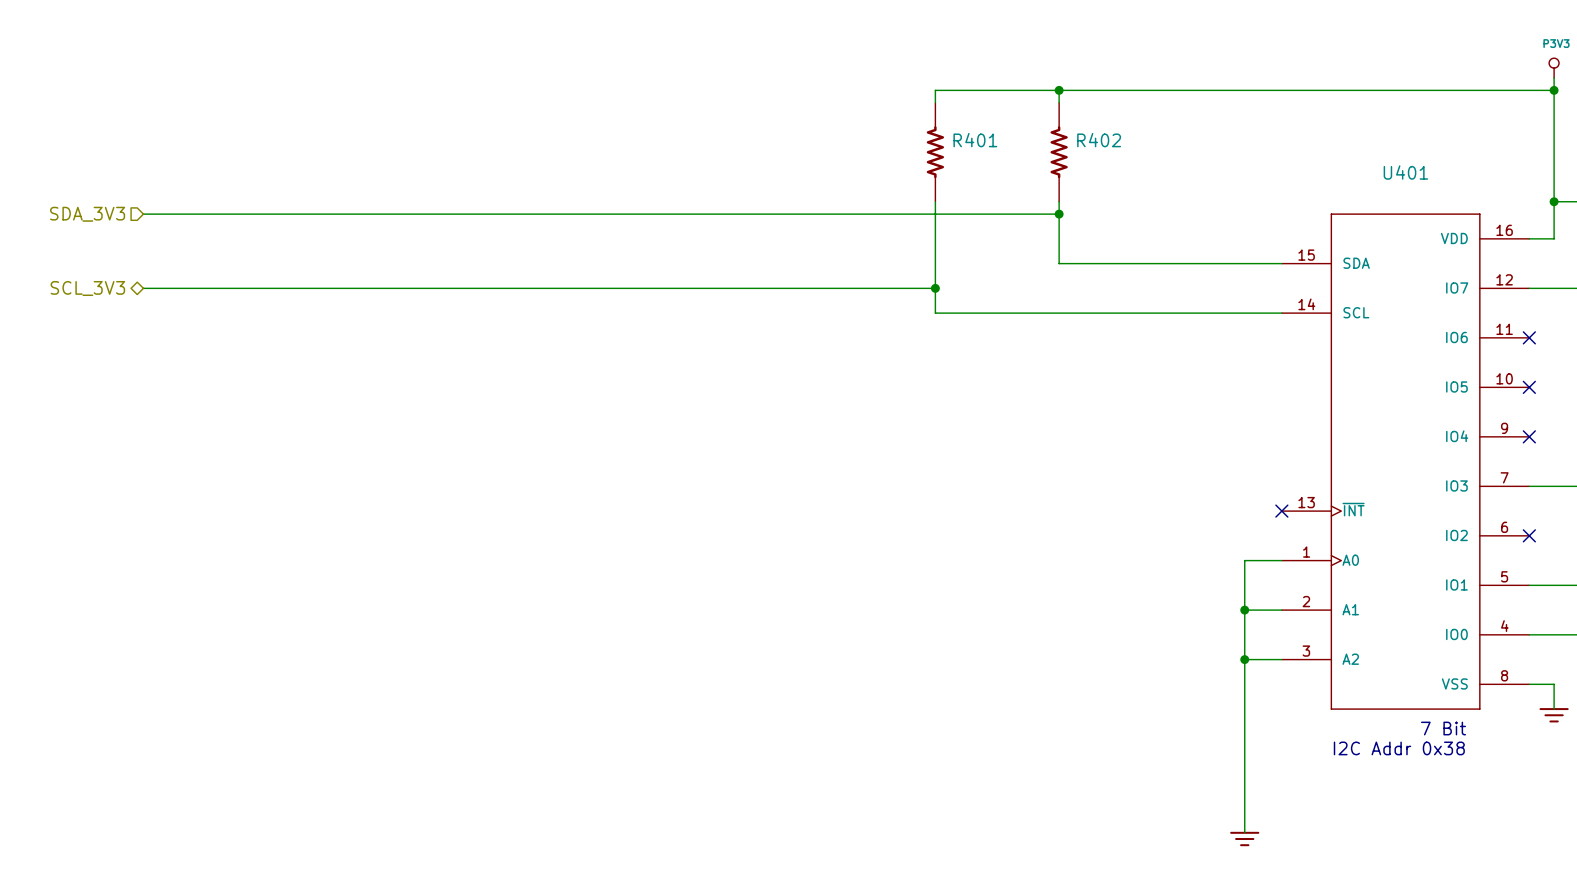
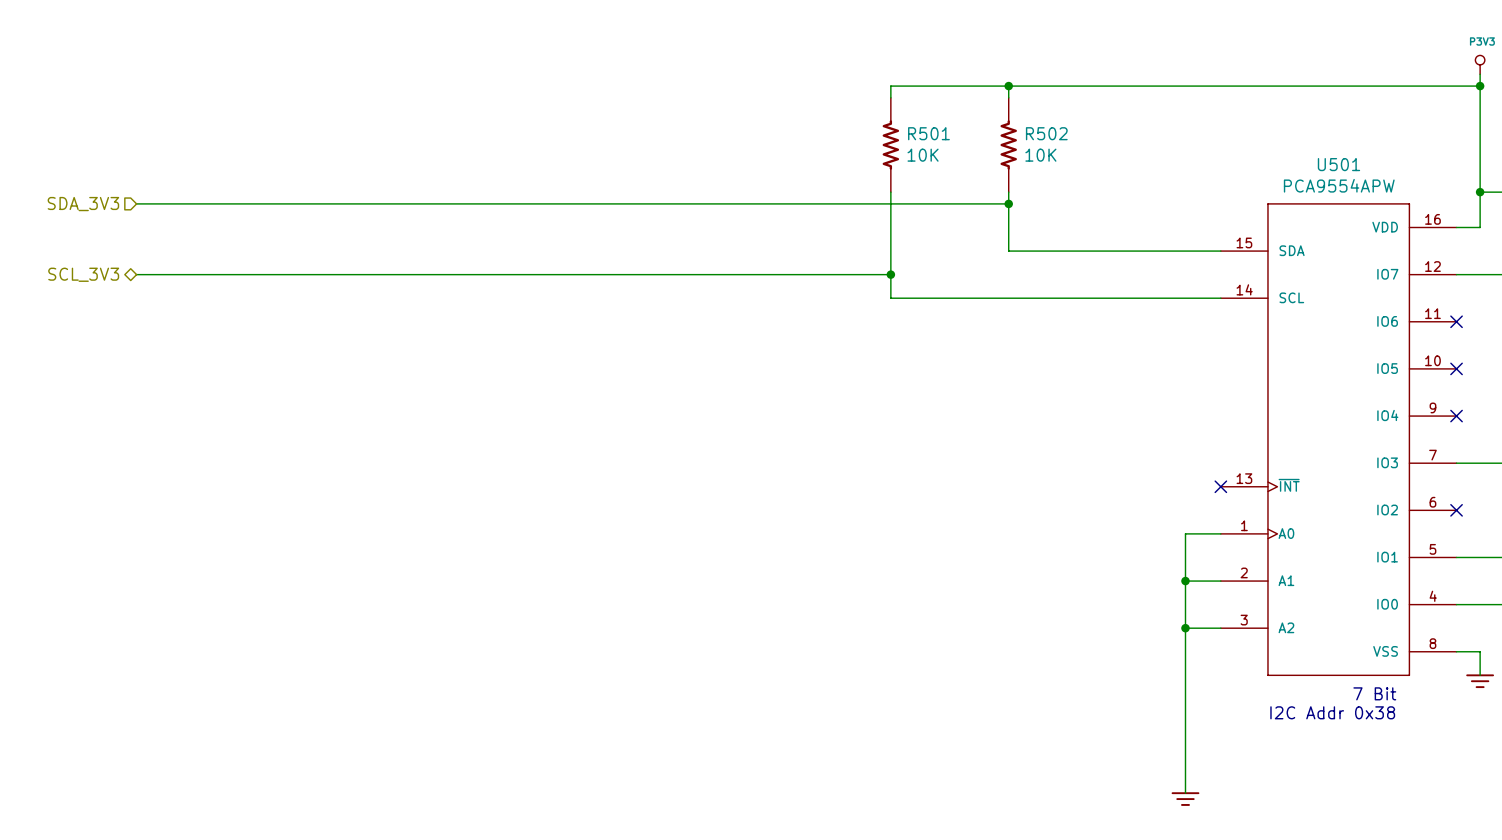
R401 name: R401 (975, 140) -> R501 (928, 133)
R402 name: R402 (1099, 140) -> R502 (1046, 133)
R401 value: none -> 10K (923, 155)
R402 value: none -> 10K (1040, 155)
U401 name: U401 (1405, 172) -> U501 (1338, 164)
U401 value: none -> PCA9554APW (1339, 185)

